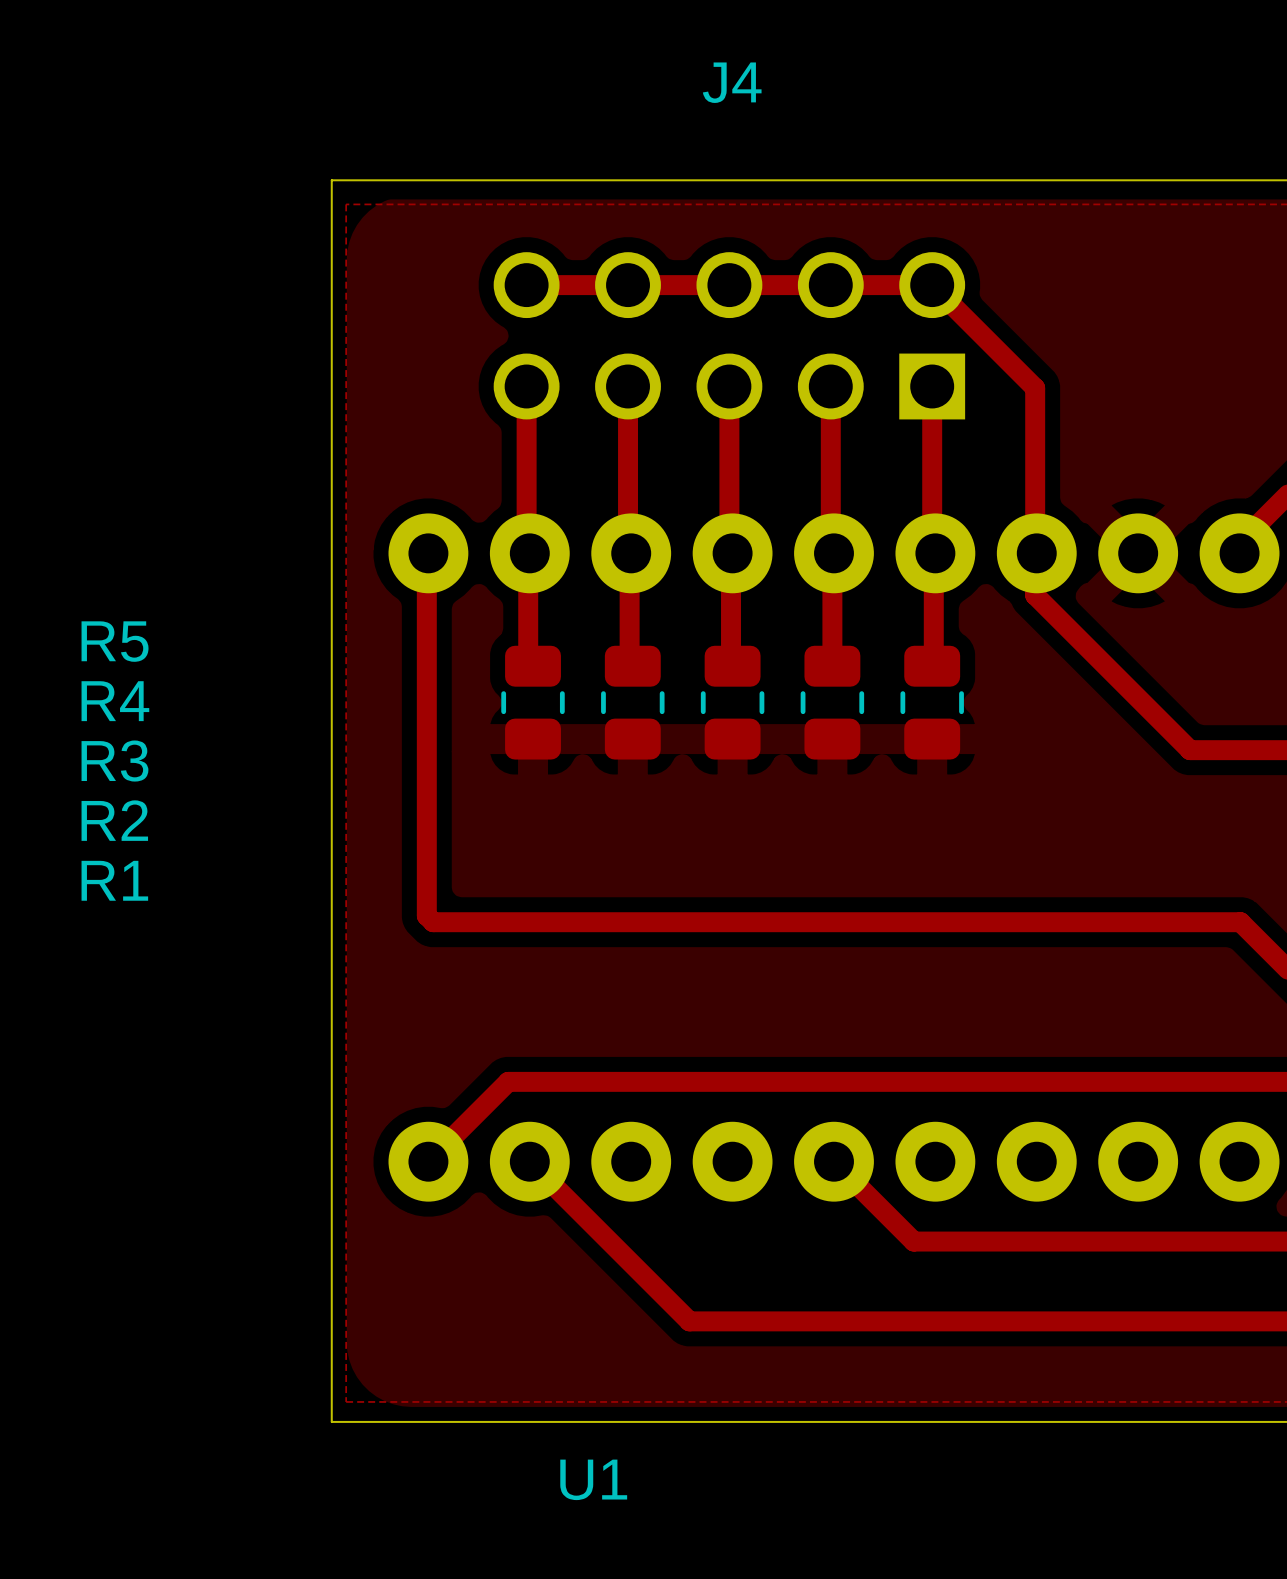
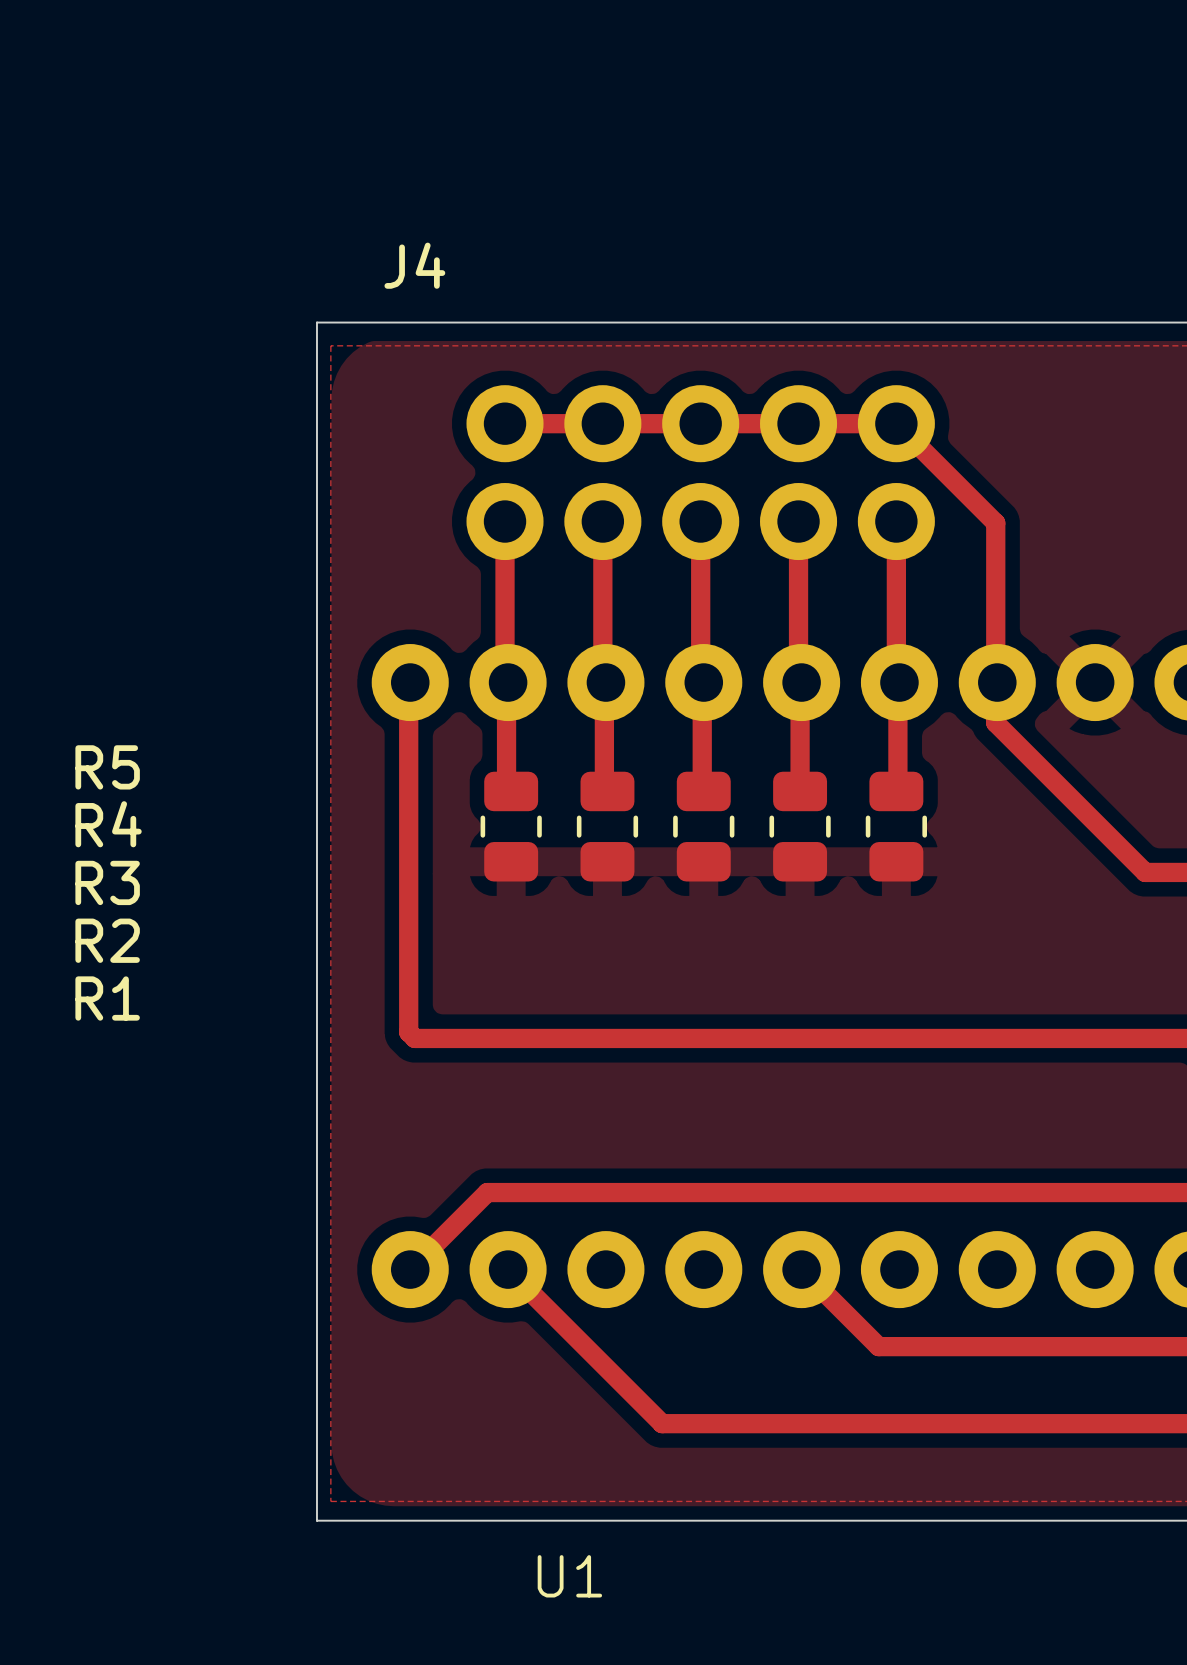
J4 name position: J4 (732, 82) -> J4 (414, 265)
J4 footprint: [493, 252, 966, 420] -> [466, 385, 935, 561]

